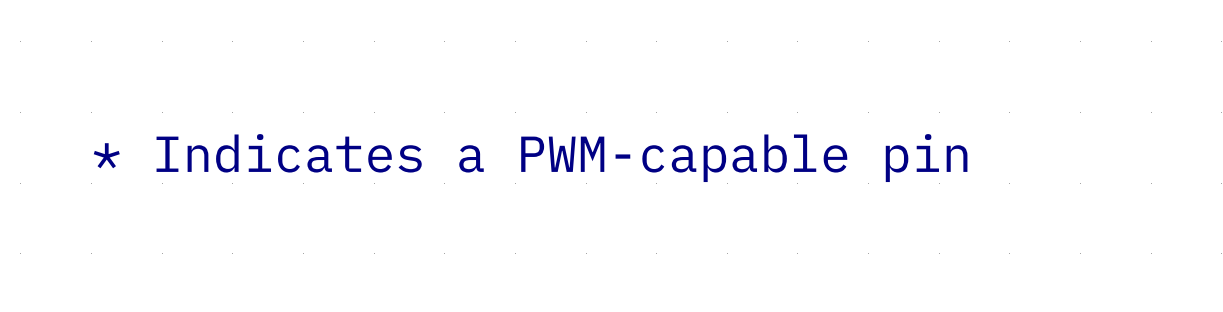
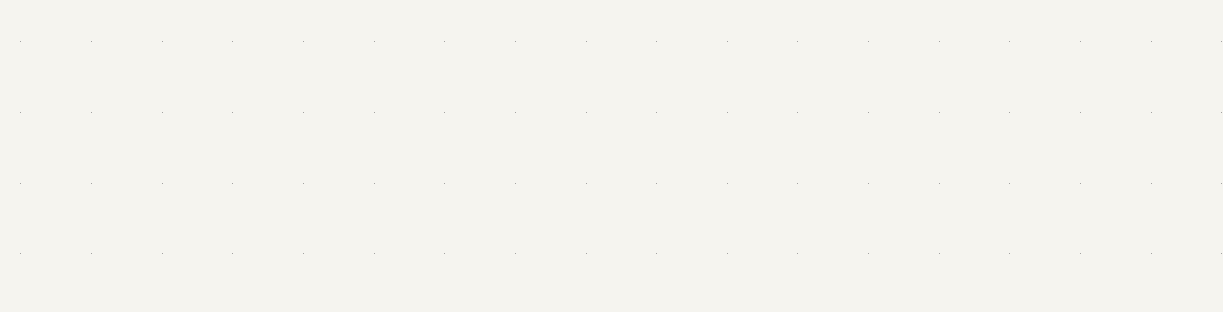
text: * Indicates a PWM-capable pin (530, 158) -> none

